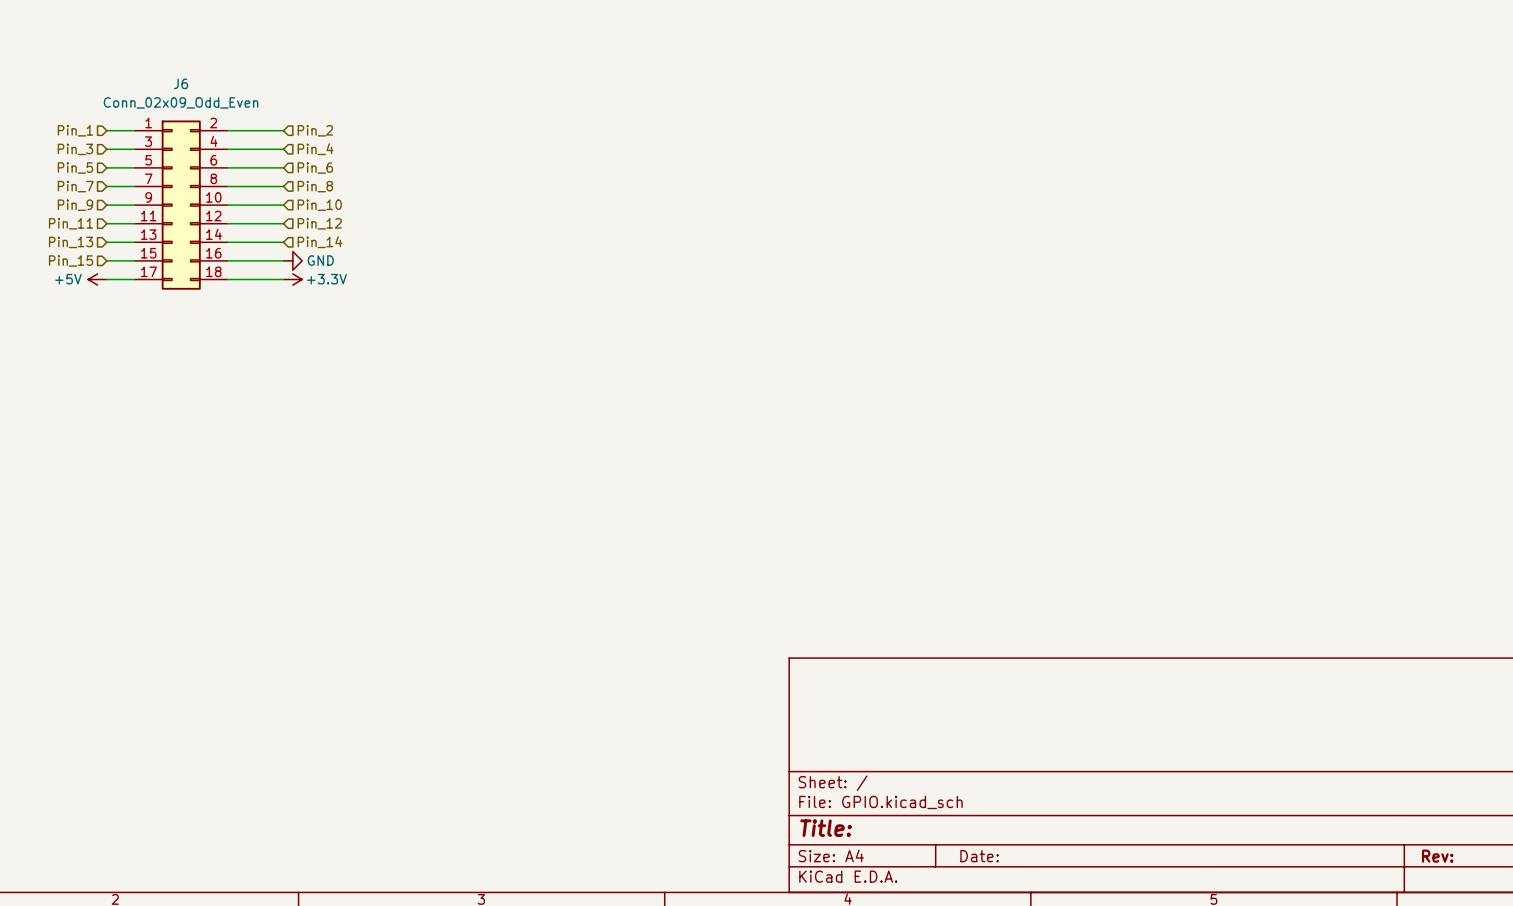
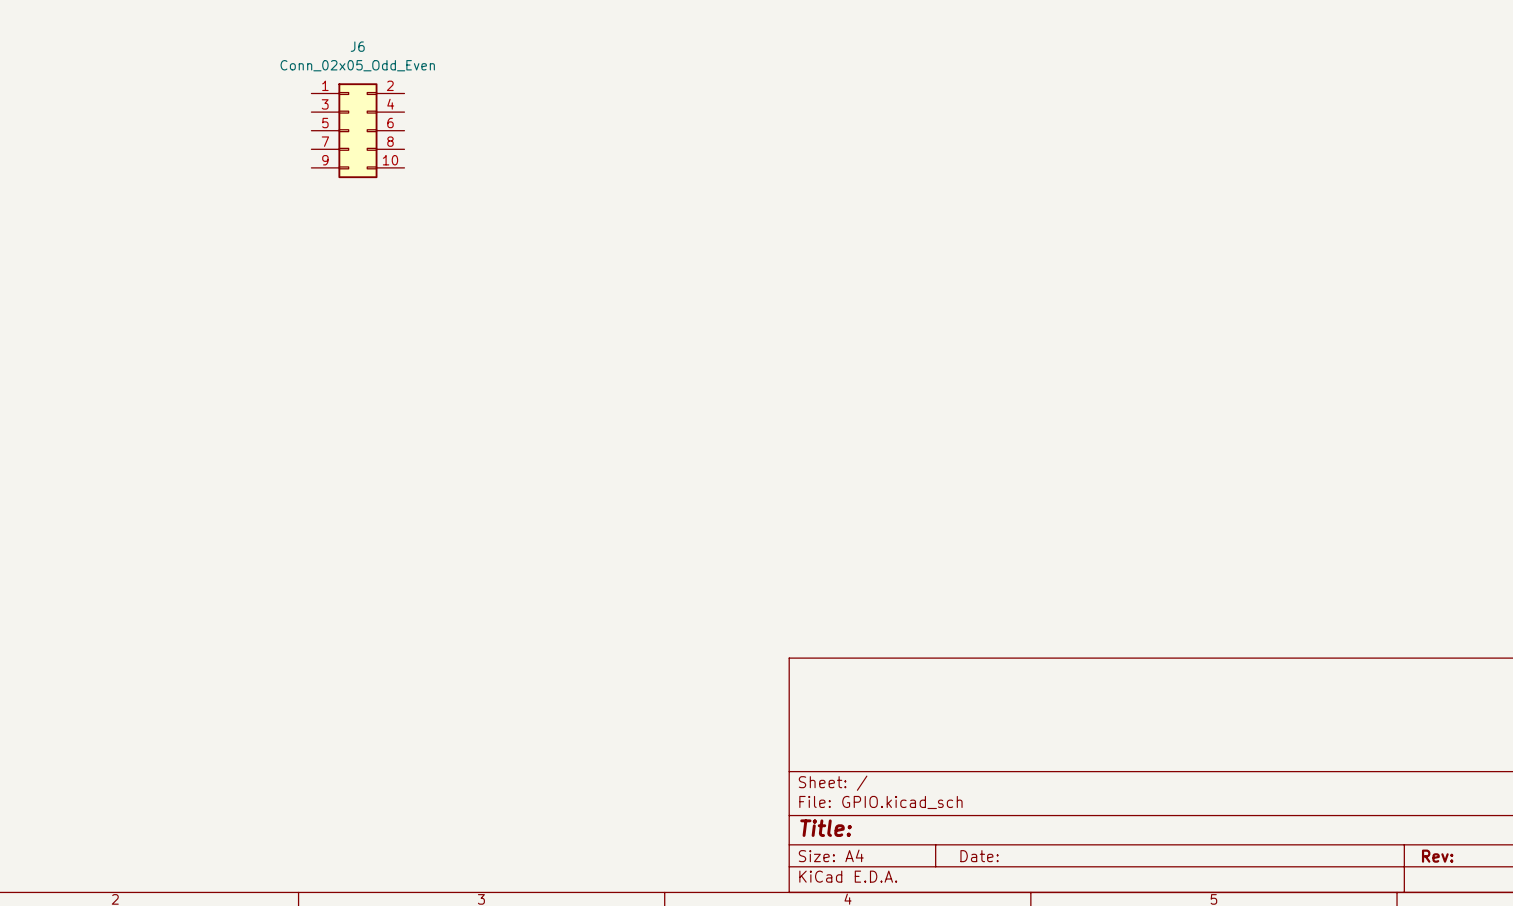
J6 name position: J6 (181, 83) -> J6 (357, 46)
J6 value: Conn_02x09_Odd_Even (181, 102) -> Conn_02x05_Odd_Even (357, 65)
J6 symbol: [134, 120, 228, 290] -> [311, 83, 405, 179]
hierarchical label: Pin_1 (75, 130) -> none
wire: (106, 130) (134, 130) -> none
wire: (227, 130) (283, 130) -> none
hierarchical label: Pin_2 (315, 130) -> none
hierarchical label: Pin_3 (75, 149) -> none
wire: (106, 149) (134, 149) -> none
wire: (227, 149) (283, 149) -> none
hierarchical label: Pin_4 (315, 149) -> none
hierarchical label: Pin_5 (75, 167) -> none
wire: (106, 167) (134, 167) -> none
wire: (227, 167) (283, 167) -> none
hierarchical label: Pin_6 (315, 167) -> none
hierarchical label: Pin_7 (75, 186) -> none
wire: (106, 186) (134, 186) -> none
wire: (227, 186) (283, 186) -> none
hierarchical label: Pin_8 (315, 186) -> none
hierarchical label: Pin_9 (75, 205) -> none
wire: (106, 205) (134, 205) -> none
wire: (227, 205) (283, 205) -> none
hierarchical label: Pin_10 (319, 205) -> none
hierarchical label: Pin_11 (71, 223) -> none
wire: (106, 223) (134, 223) -> none
wire: (227, 223) (283, 223) -> none
hierarchical label: Pin_12 (319, 223) -> none
hierarchical label: Pin_13 (71, 242) -> none
wire: (106, 242) (134, 242) -> none
wire: (227, 242) (283, 242) -> none
hierarchical label: Pin_14 (320, 242) -> none
wire: (106, 260) (134, 260) -> none
wire: (227, 260) (283, 260) -> none
power symbol: GND (292, 260) -> none
hierarchical label: Pin_15 (71, 261) -> none
power symbol: +5V (97, 279) -> none
wire: (106, 279) (134, 279) -> none
wire: (227, 279) (283, 279) -> none
power symbol: +3.3V (292, 279) -> none

